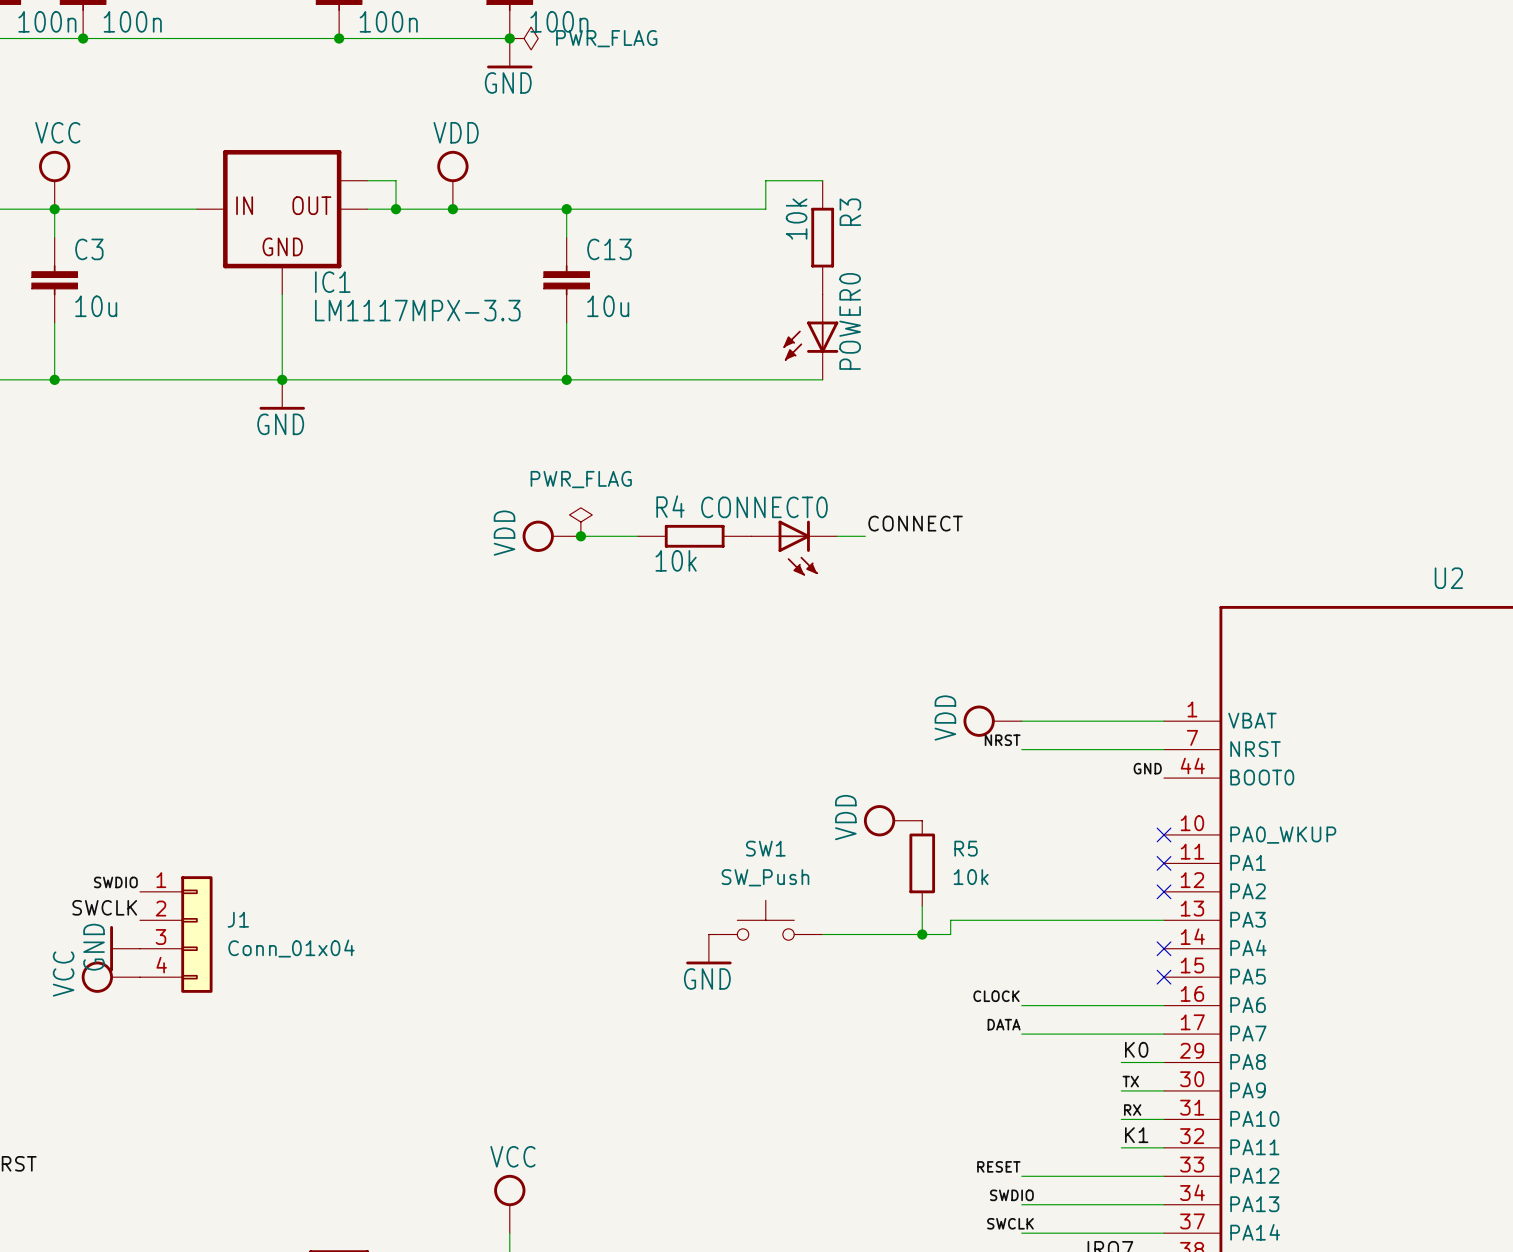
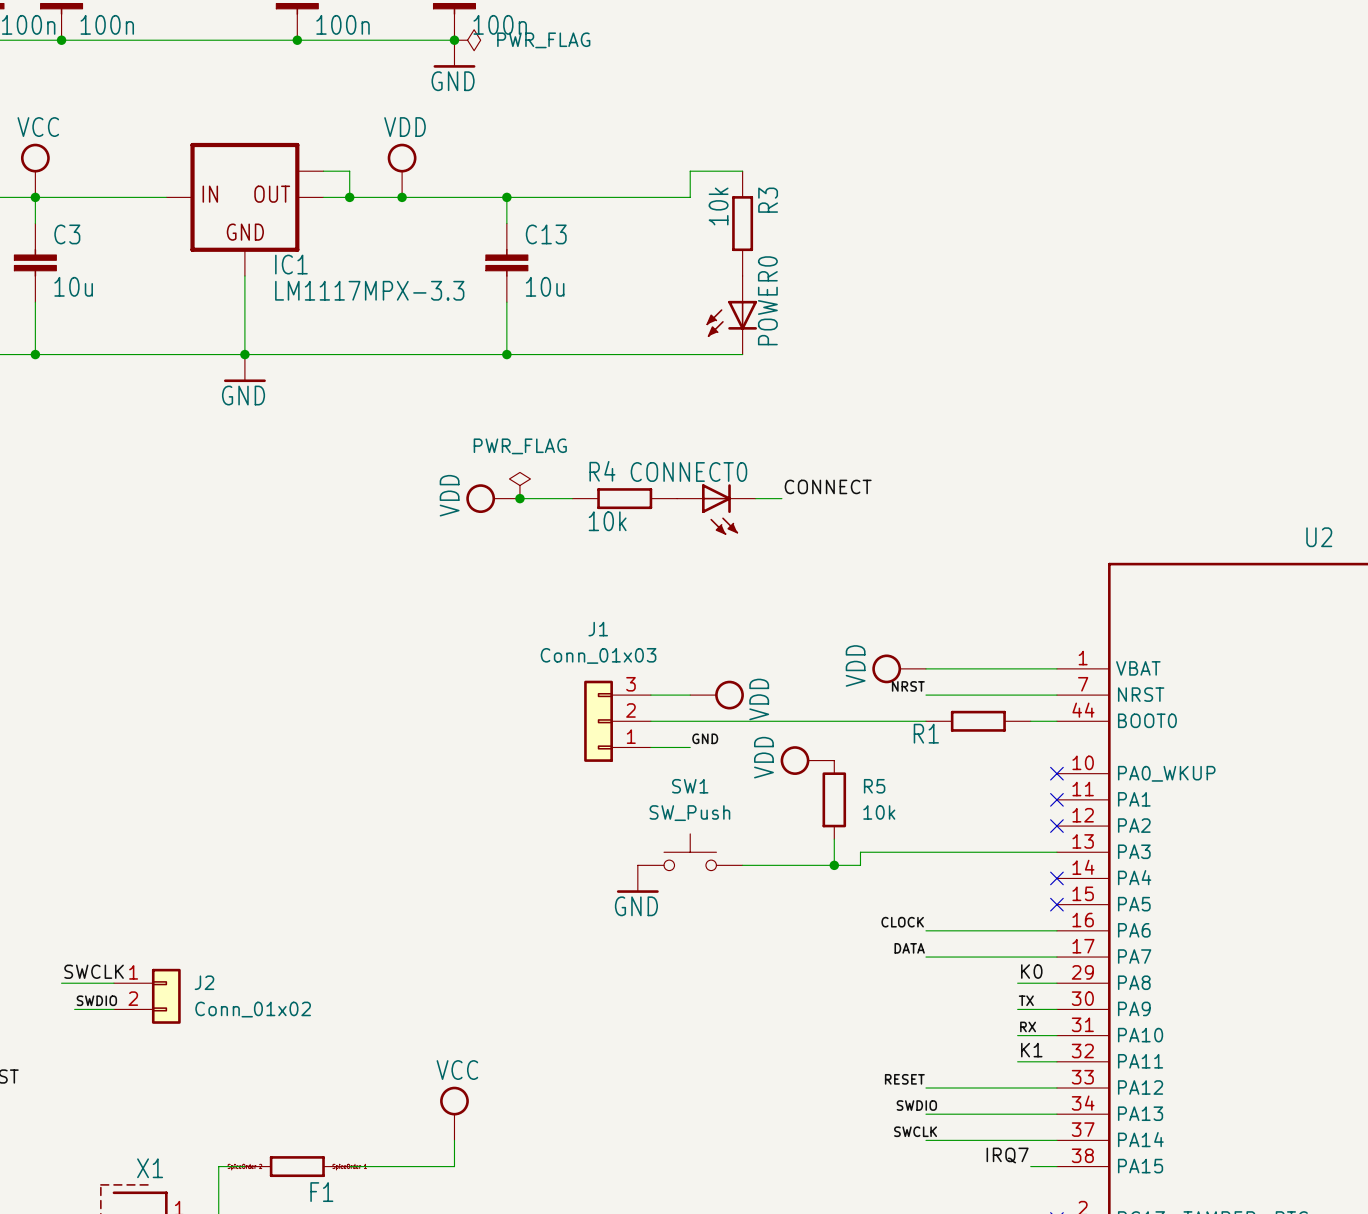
wire: none -> (650, 695) (690, 695)
power symbol: none -> VDD (717, 695)
label: GND (1147, 768) -> none
wire: none -> (650, 721) (925, 721)
R1: none -> (978, 721)
wire: none -> (1030, 721) (1056, 721)
label: none -> GND (705, 738)
wire: none -> (650, 747) (690, 747)
J1 symbol: [140, 876, 213, 993] -> [584, 680, 651, 762]
label position: SWDIO (115, 882) -> SWDIO (96, 1000)
label position: SWCLK (104, 907) -> SWCLK (94, 971)
J1 name position: J1 (238, 919) -> J1 (598, 629)
power symbol: GND (125, 948) -> none
J1 value: Conn_01x04 (291, 948) -> Conn_01x03 (598, 655)
power symbol: VCC (110, 977) -> none
wire: none -> (61, 983) (113, 983)
J2: none -> Conn_01x02 (147, 996)
wire: none -> (74, 1009) (113, 1009)

